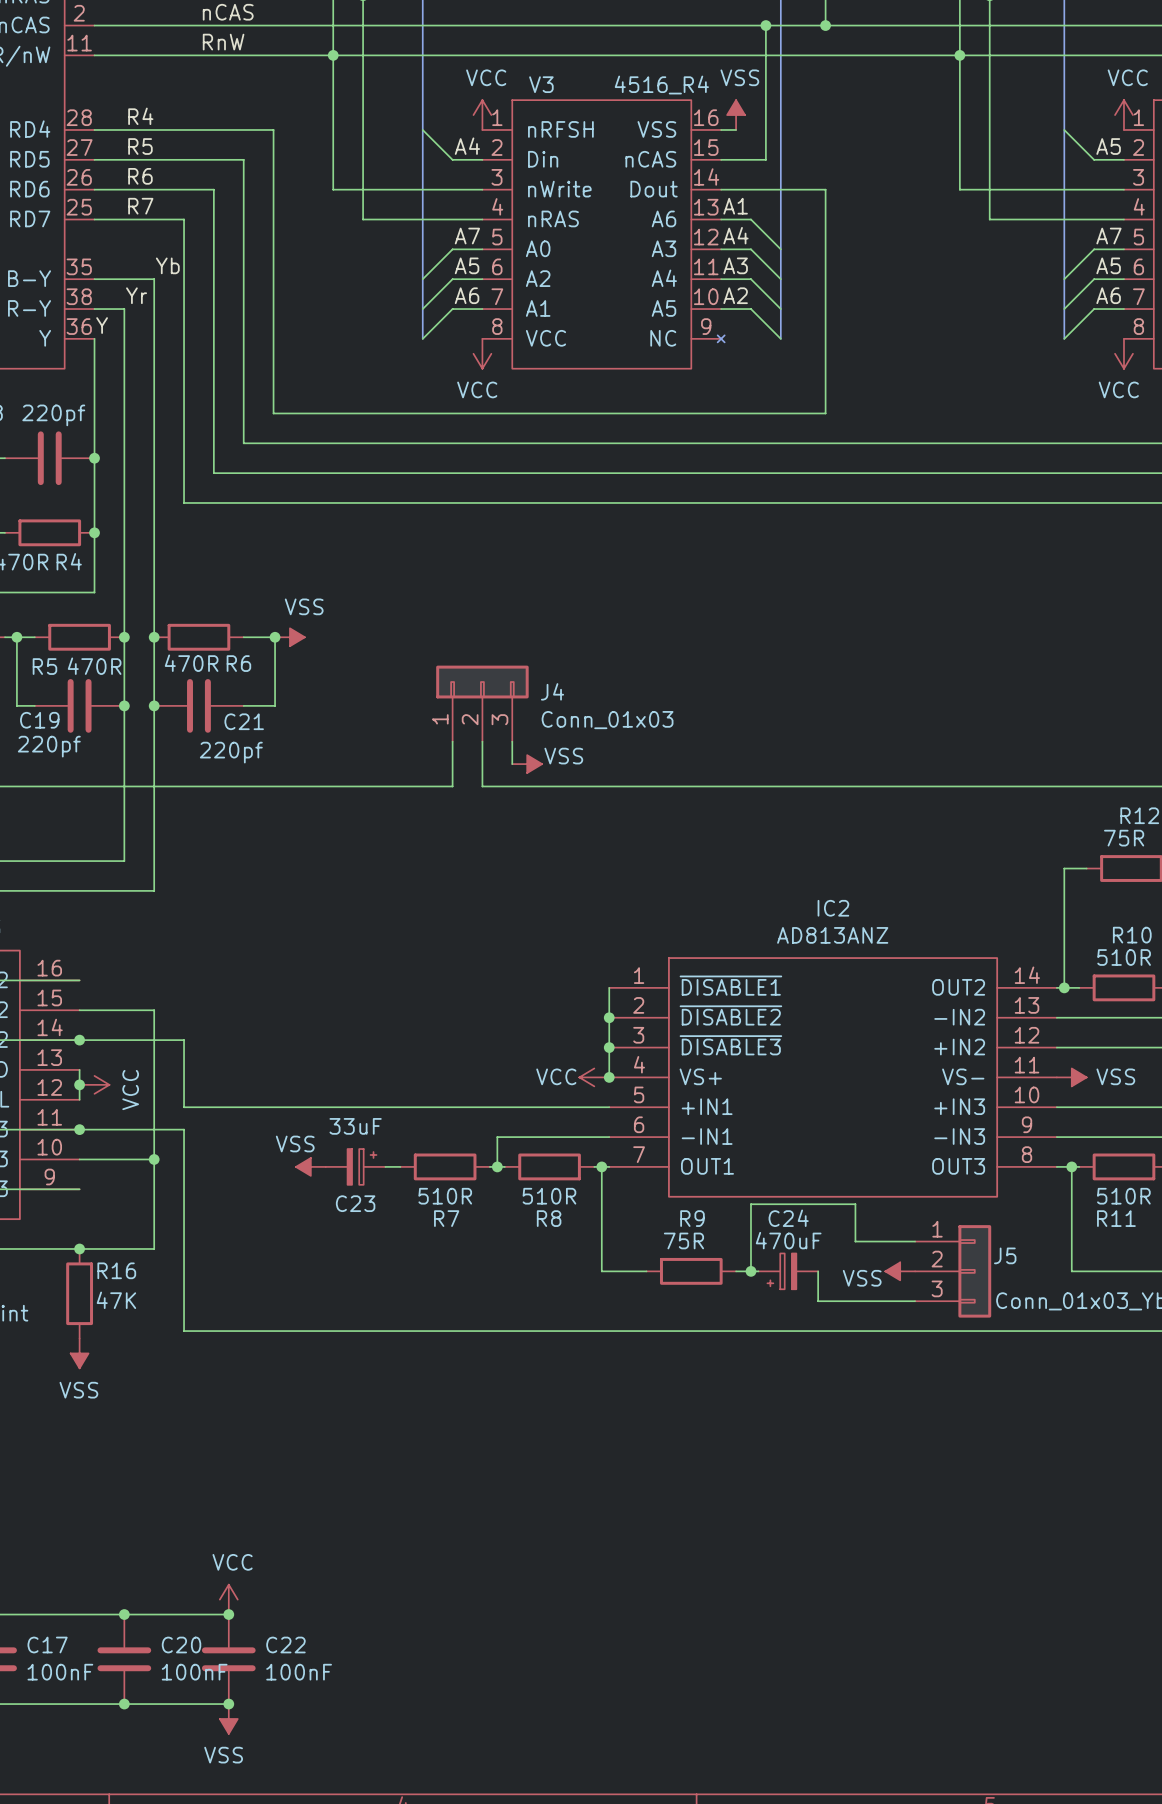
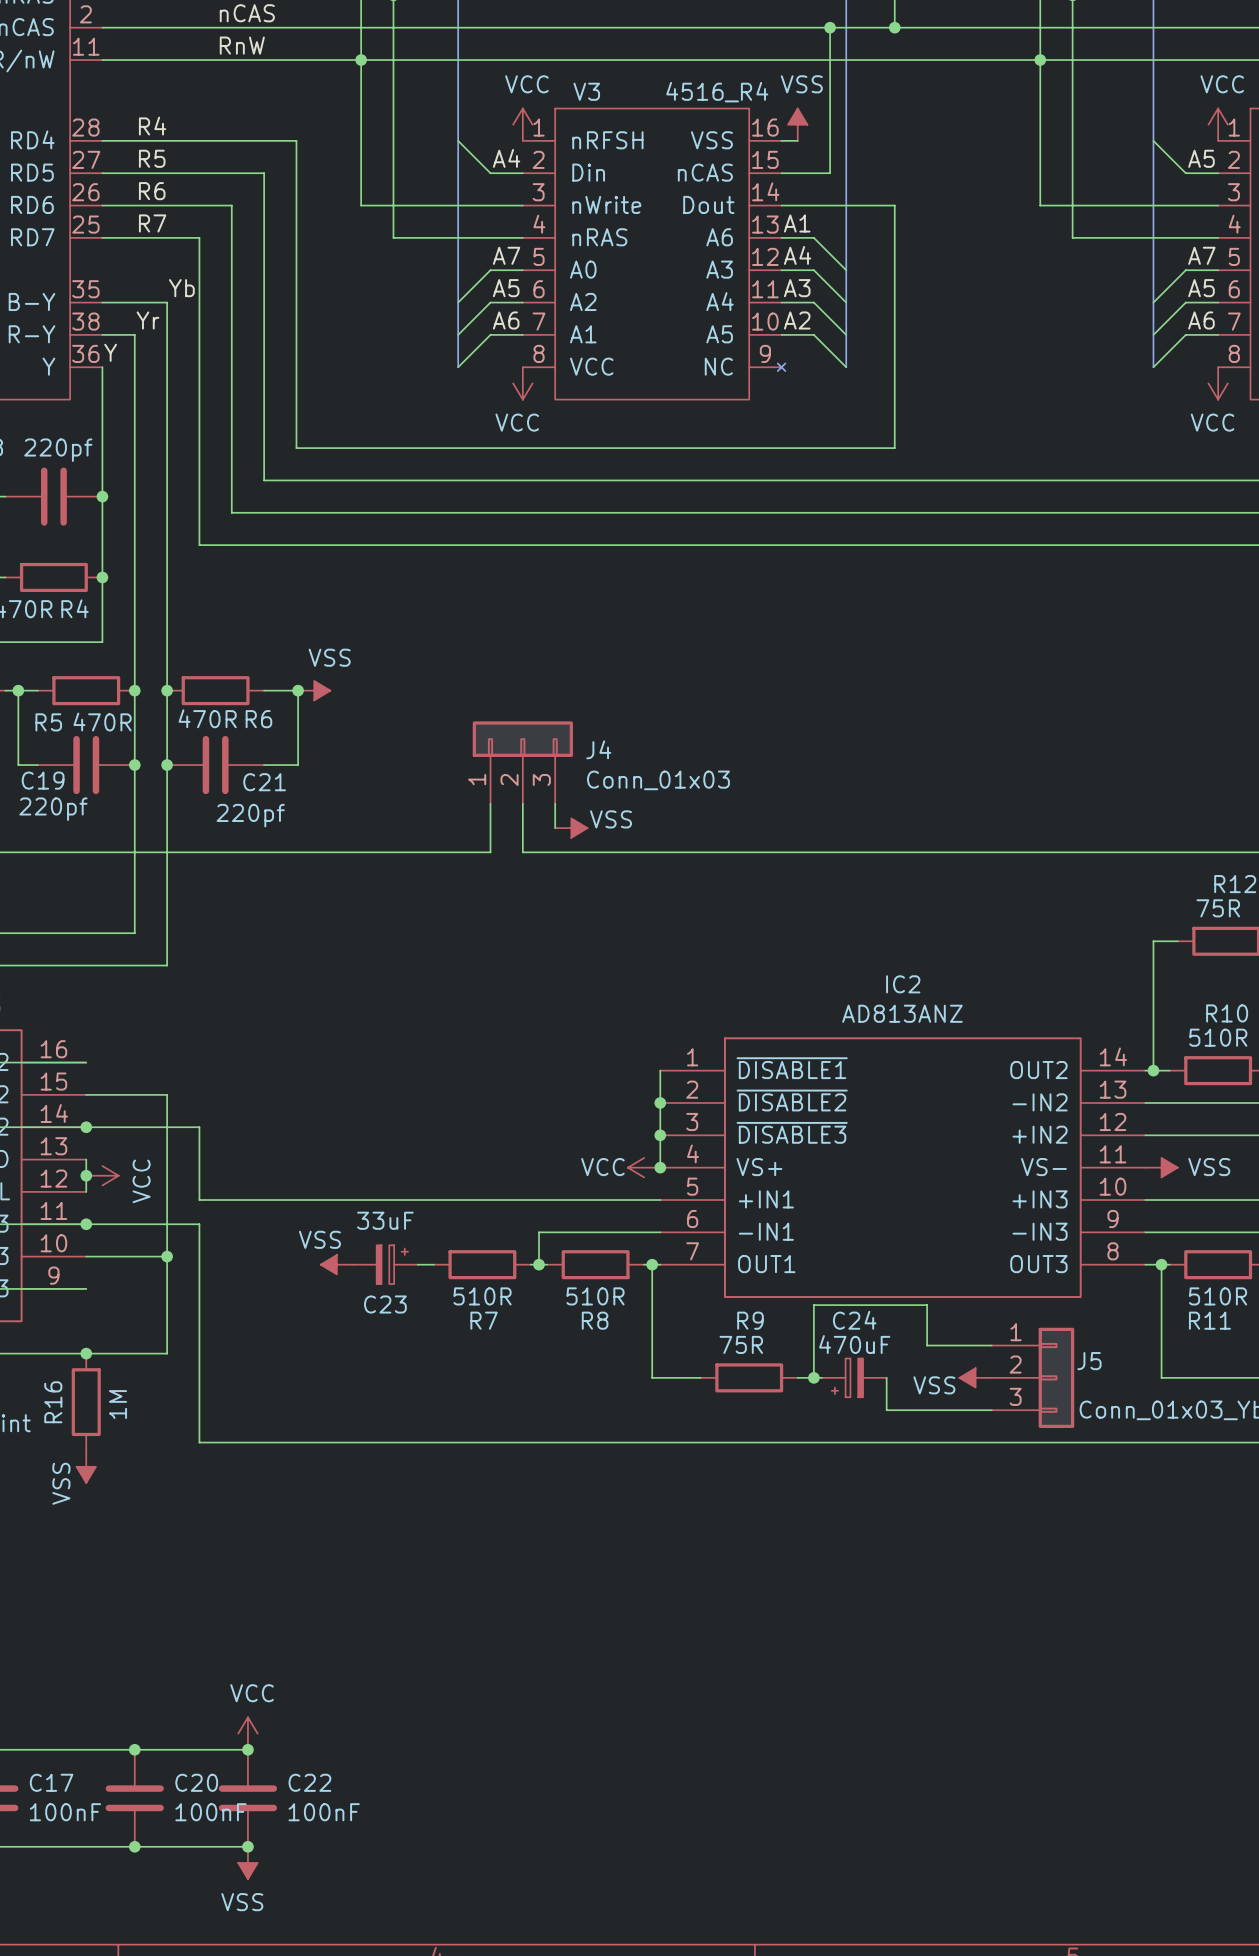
R16 name rotation: 0° (116, 1270) -> 90° counterclockwise (53, 1402)
R16 name position: R16 (116, 1270) -> R16 (53, 1402)
R16 value: 47K (116, 1300) -> 1M (117, 1404)
power symbol text rotation: 0° (78, 1390) -> 90° counterclockwise (61, 1483)

